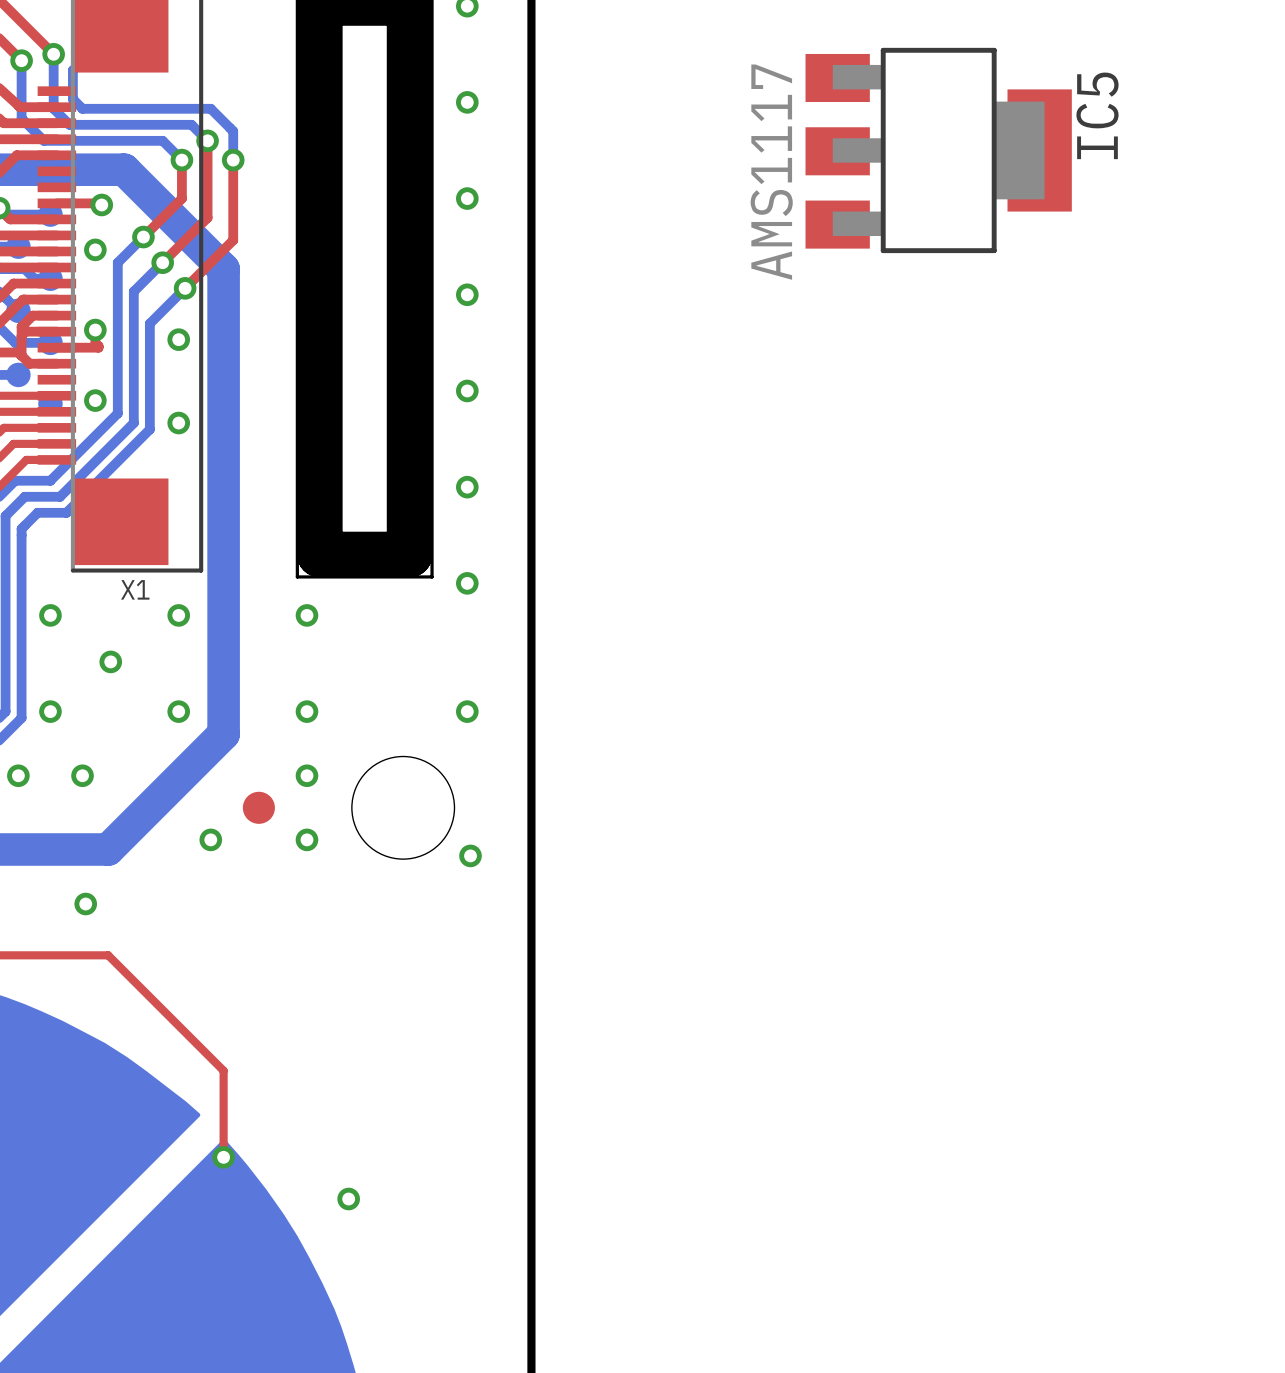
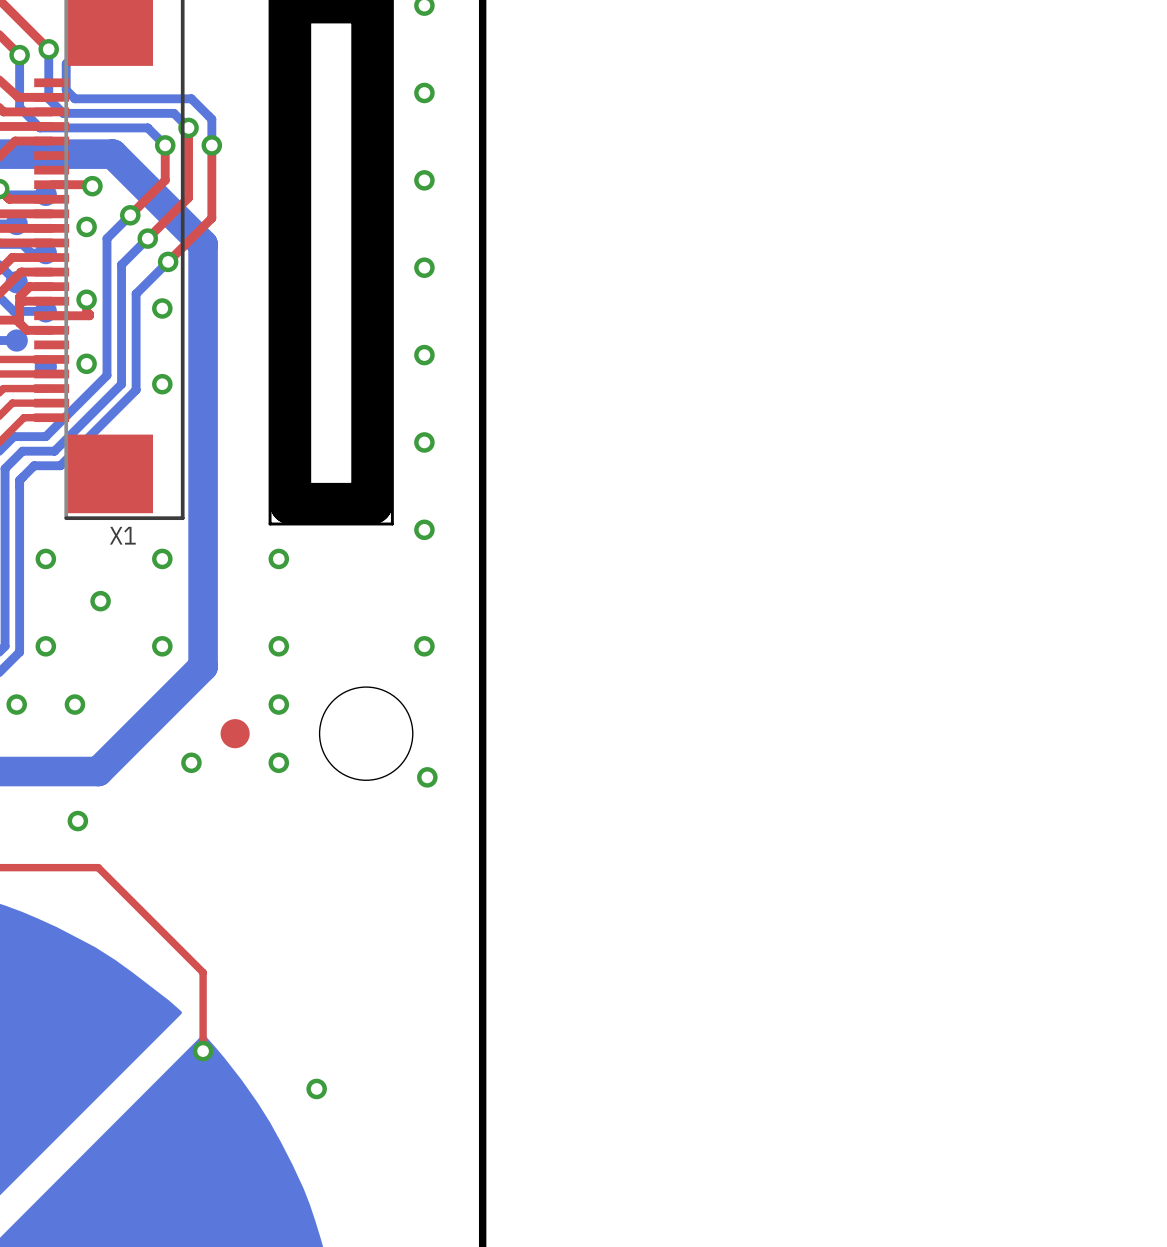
IC5: AMS1117 (938, 150) -> none

